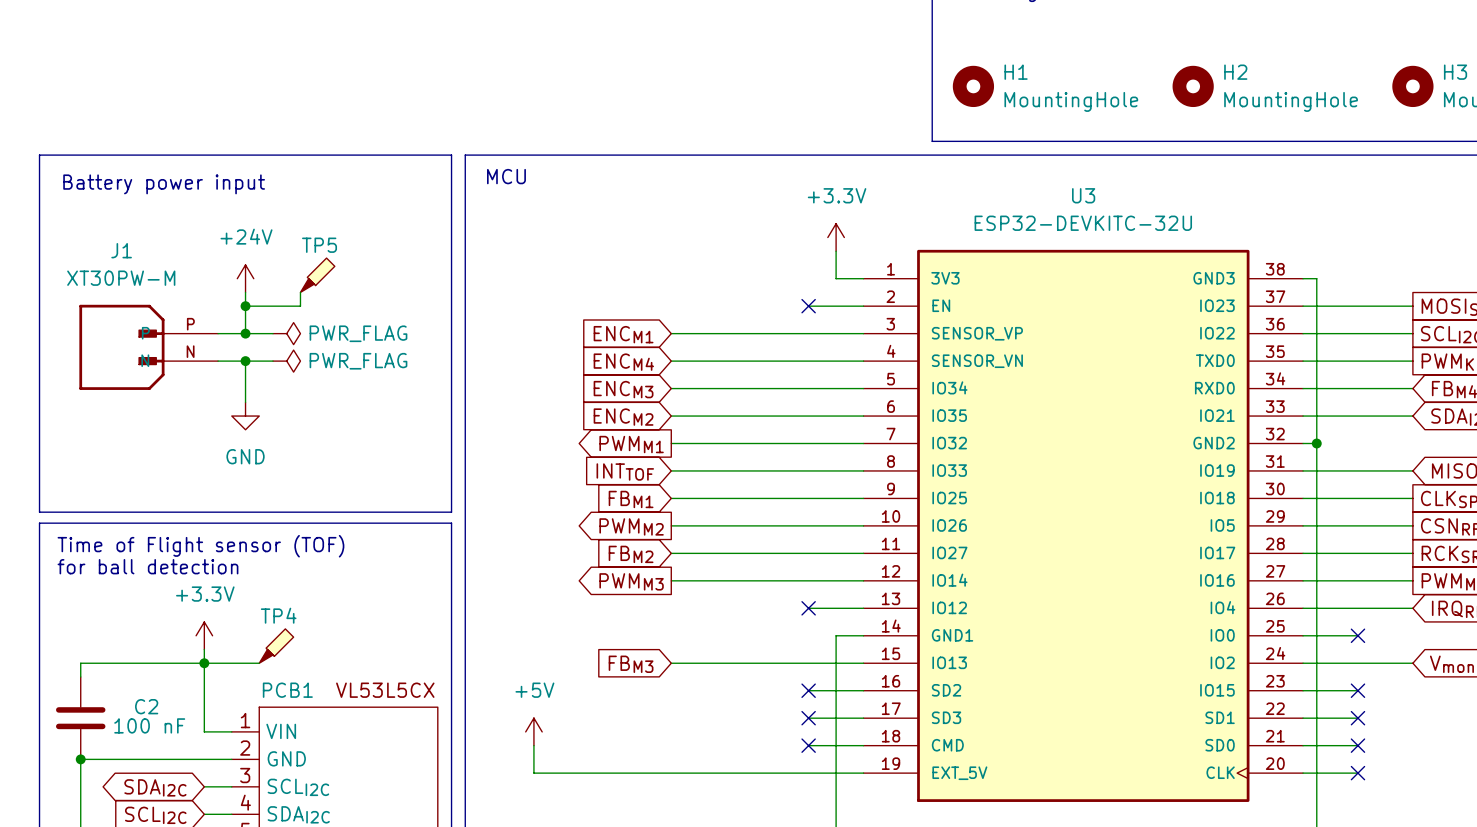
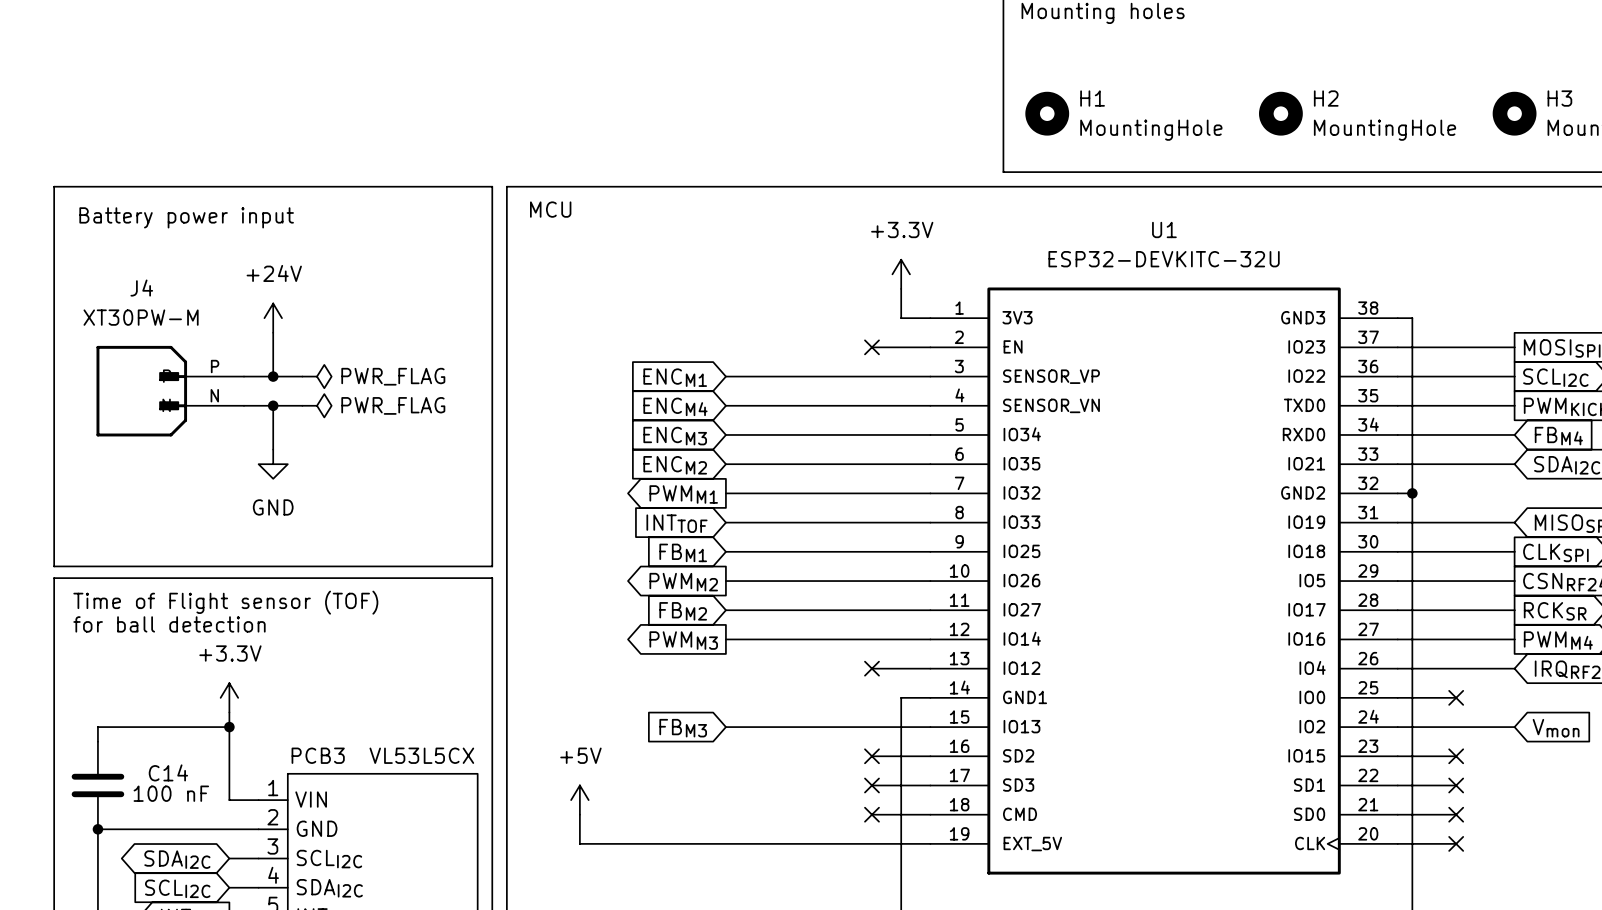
U3 name: U3 (1083, 195) -> U1 (1164, 229)
J1 name: J1 (121, 250) -> J4 (141, 288)
TP5: (317, 275) -> none
wire: (300, 292) (300, 306) (245, 306) -> none
junction: (245, 306) -> none
TP4: (276, 646) -> none
wire: (204, 663) (259, 663) -> none
PCB1 name: PCB1 (287, 690) -> PCB3 (318, 755)
C2 name: C2 (146, 706) -> C14 (168, 772)

